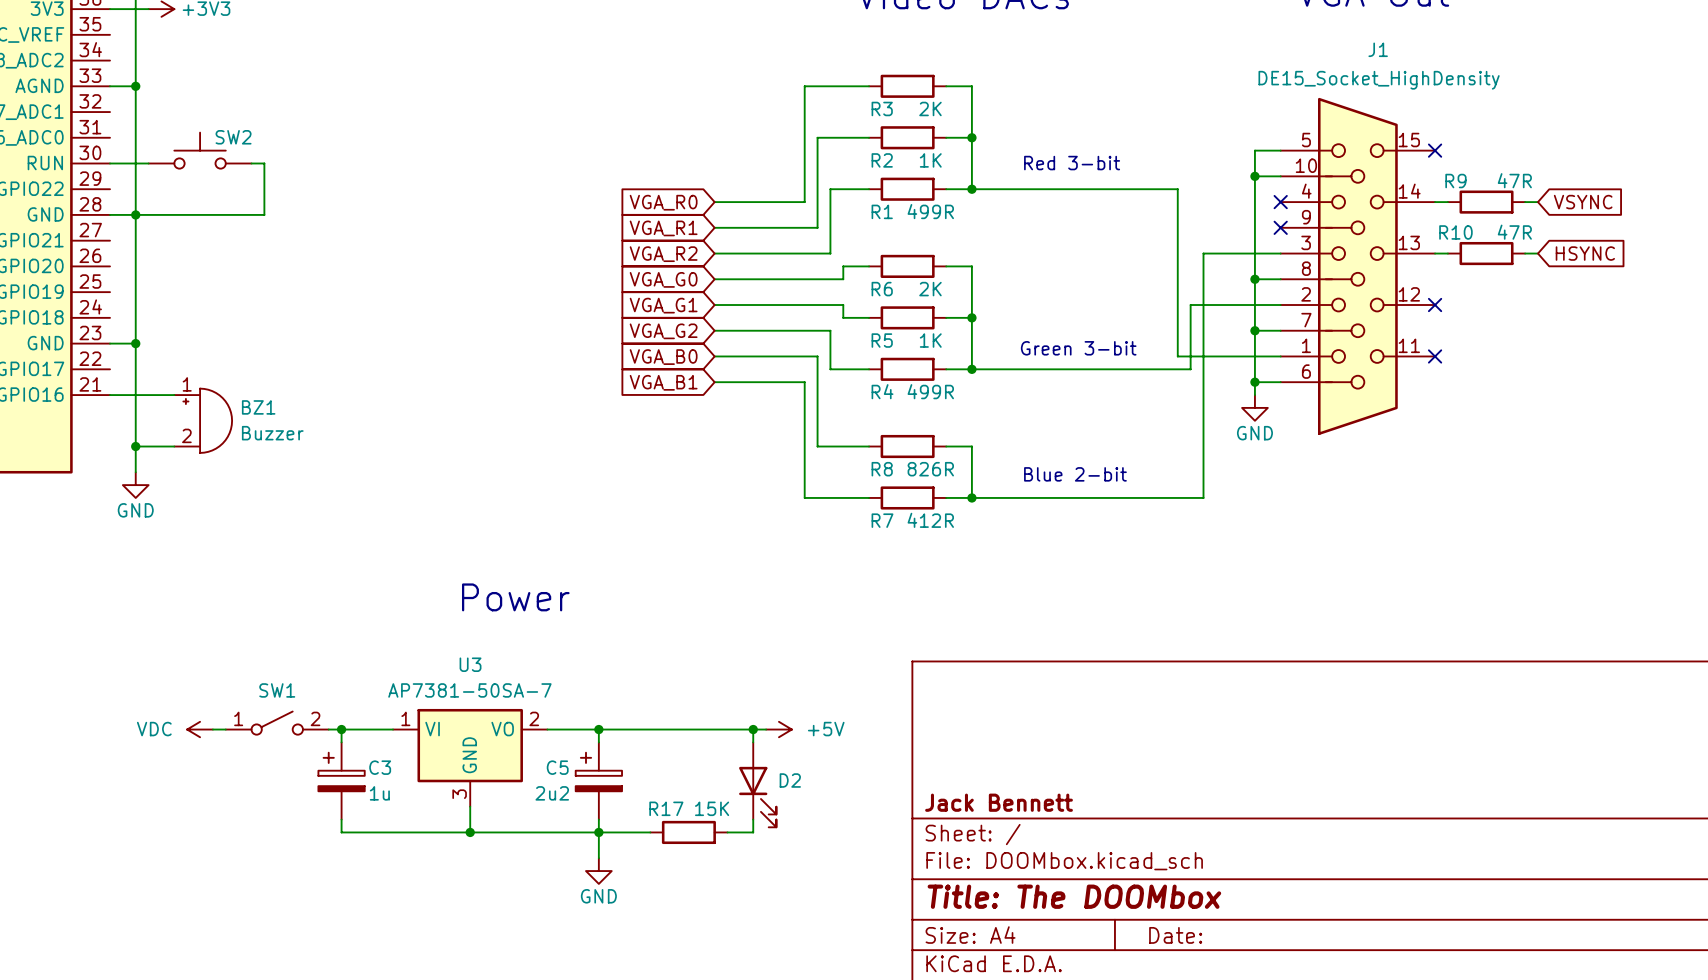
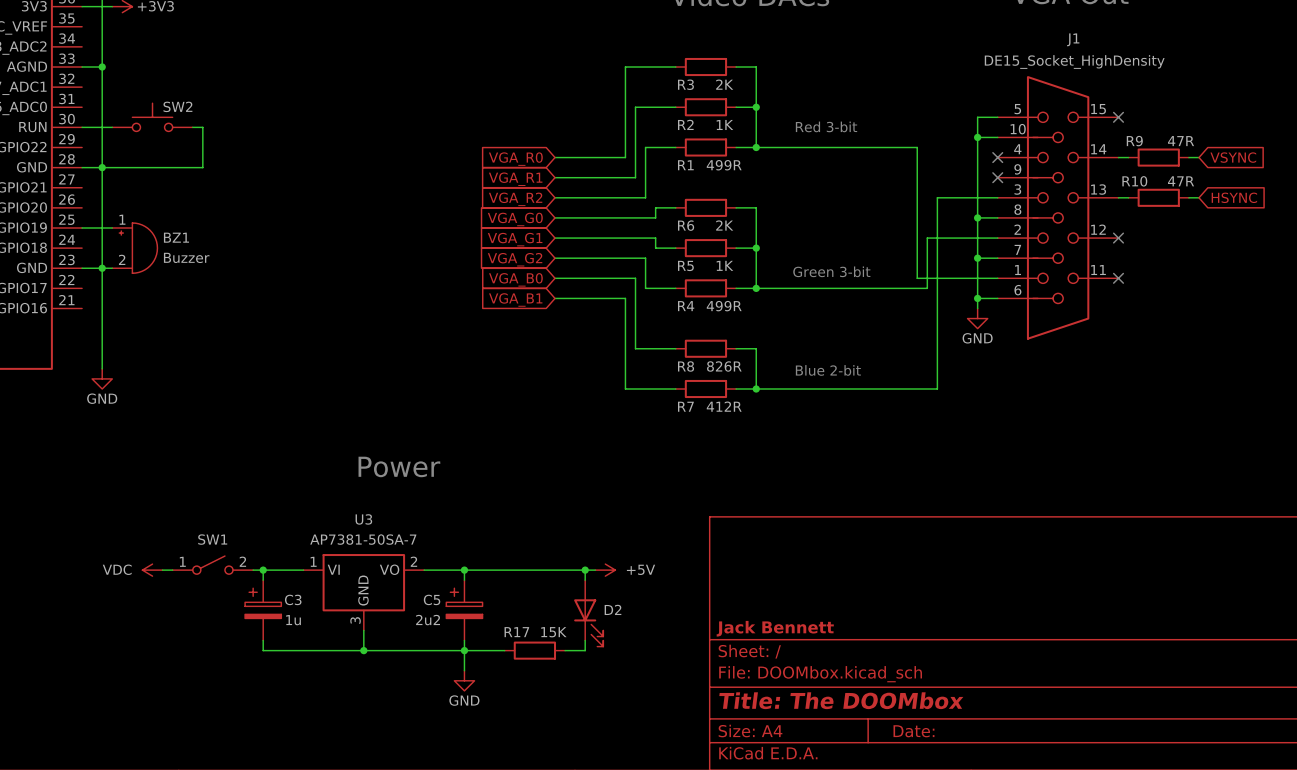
wire: none -> (102, 268) (112, 268)
wire: (110, 395) (174, 395) -> none
BZ1 position: (203, 420) -> (134, 248)
wire: (135, 446) (174, 446) -> (82, 228) (112, 228)
junction: (135, 446) -> none

